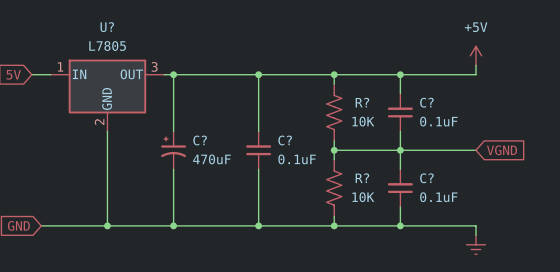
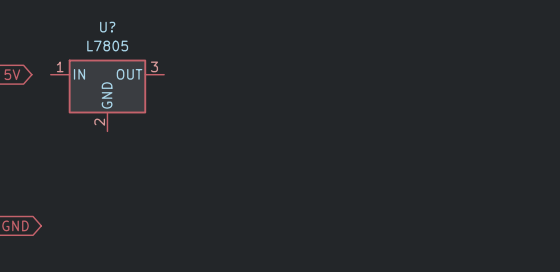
power symbol: +5V (475, 55) -> none
wire: (475, 65) (475, 74) (164, 74) -> none
wire: (31, 74) (50, 74) -> none
wire: (173, 74) (173, 131) -> none
junction: (173, 74) -> none
wire: (258, 74) (258, 131) -> none
junction: (258, 74) -> none
wire: (334, 74) (334, 84) -> none
junction: (334, 74) -> none
wire: (400, 74) (400, 93) -> none
junction: (400, 74) -> none
R?: 10K (334, 112) -> none
C?: 0.1uF (400, 112) -> none
wire: (107, 131) (107, 225) -> none
wire: (400, 131) (400, 169) -> none
wire: (334, 140) (334, 159) -> none
C?: 470uF (173, 150) -> none
C?: 0.1uF (258, 150) -> none
wire: (334, 150) (475, 150) -> none
junction: (334, 150) -> none
junction: (400, 150) -> none
global label: VGND (501, 150) -> none
wire: (173, 169) (173, 225) -> none
wire: (258, 169) (258, 225) -> none
R?: 10K (334, 188) -> none
C?: 0.1uF (400, 188) -> none
wire: (400, 206) (400, 225) -> none
wire: (334, 216) (334, 225) -> none
wire: (41, 225) (475, 225) (475, 235) -> none
junction: (107, 225) -> none
junction: (173, 225) -> none
junction: (258, 225) -> none
junction: (334, 225) -> none
junction: (400, 225) -> none
power symbol: (475, 244) -> none

